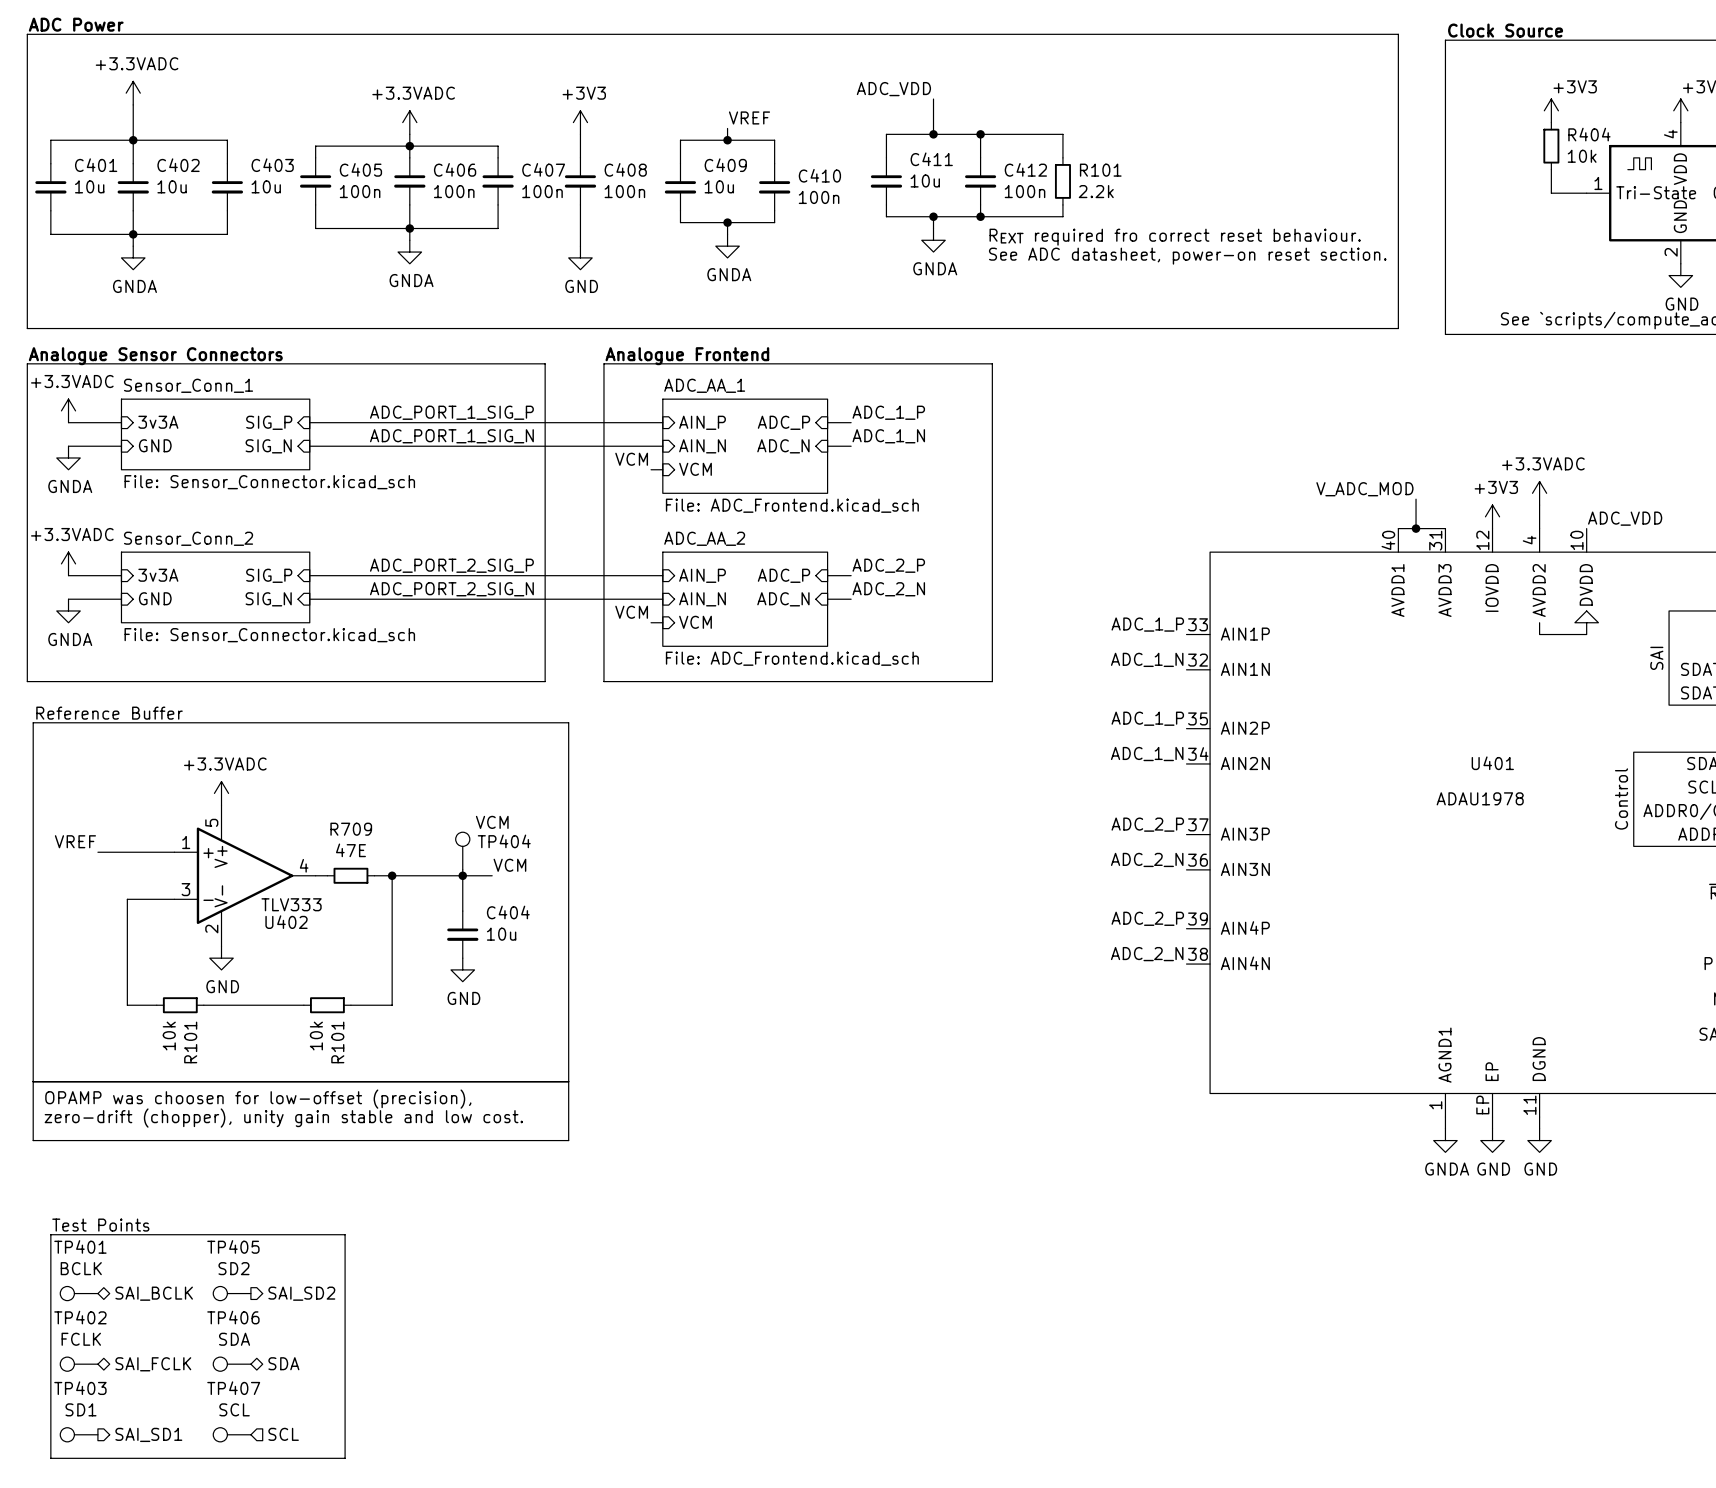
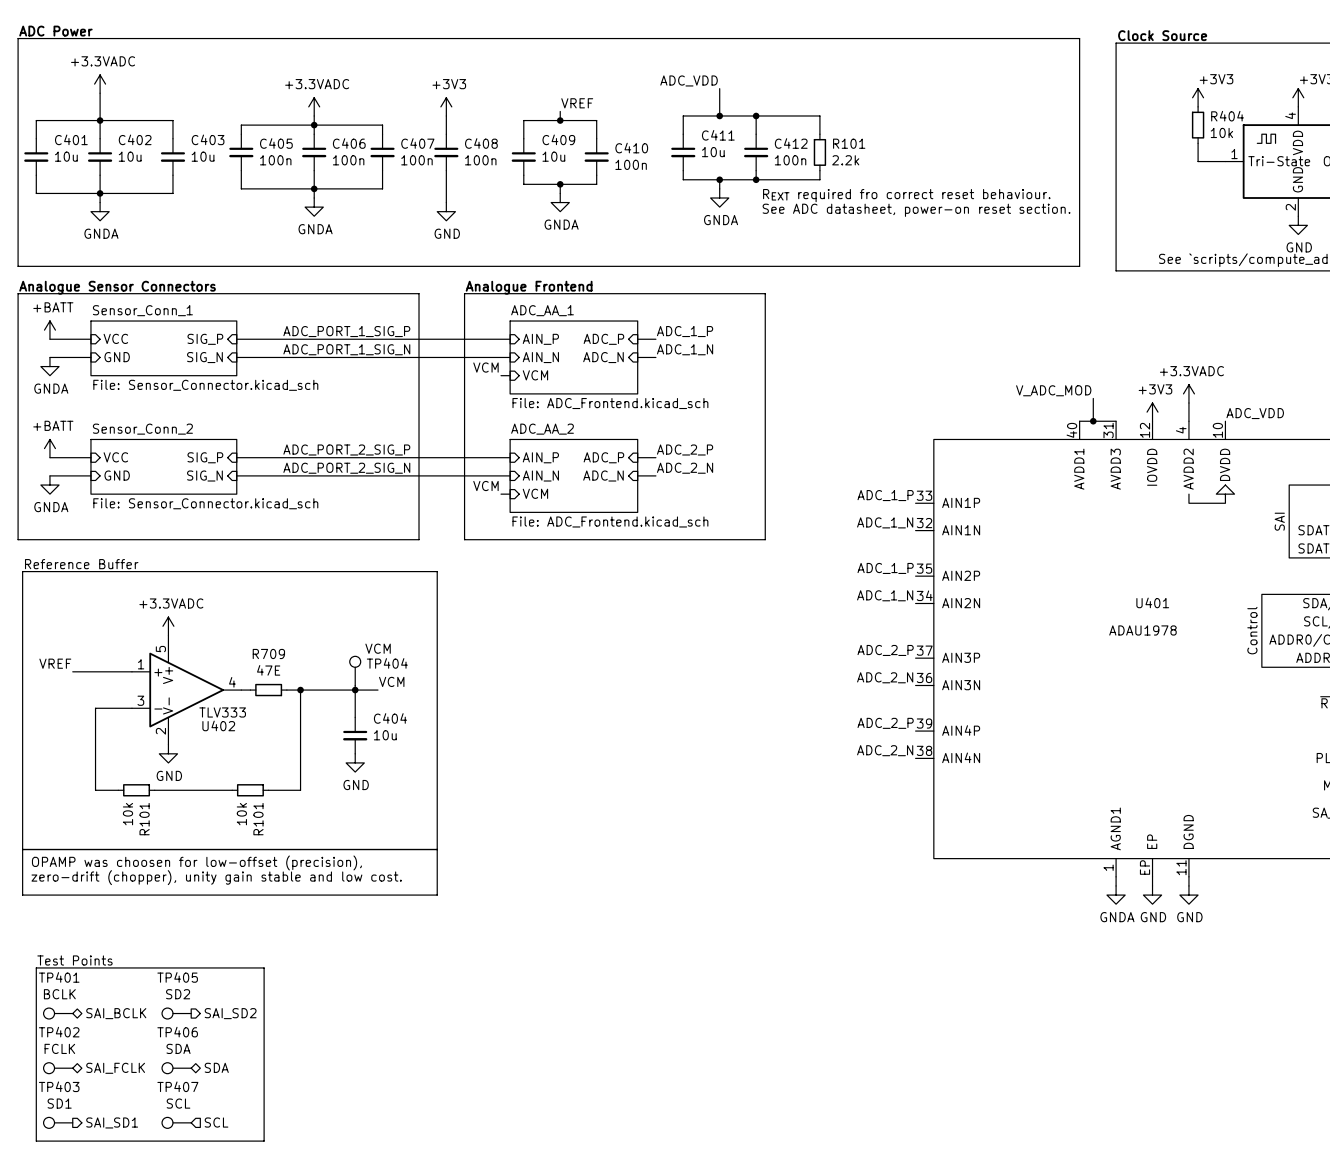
power symbol: +3.3VADC (68, 410) -> +BATT (49, 330)
sheet pin: 3v3A (158, 422) -> VCC (115, 338)
power symbol: +3.3VADC (68, 563) -> +BATT (49, 448)
sheet pin: 3v3A (158, 575) -> VCC (115, 457)

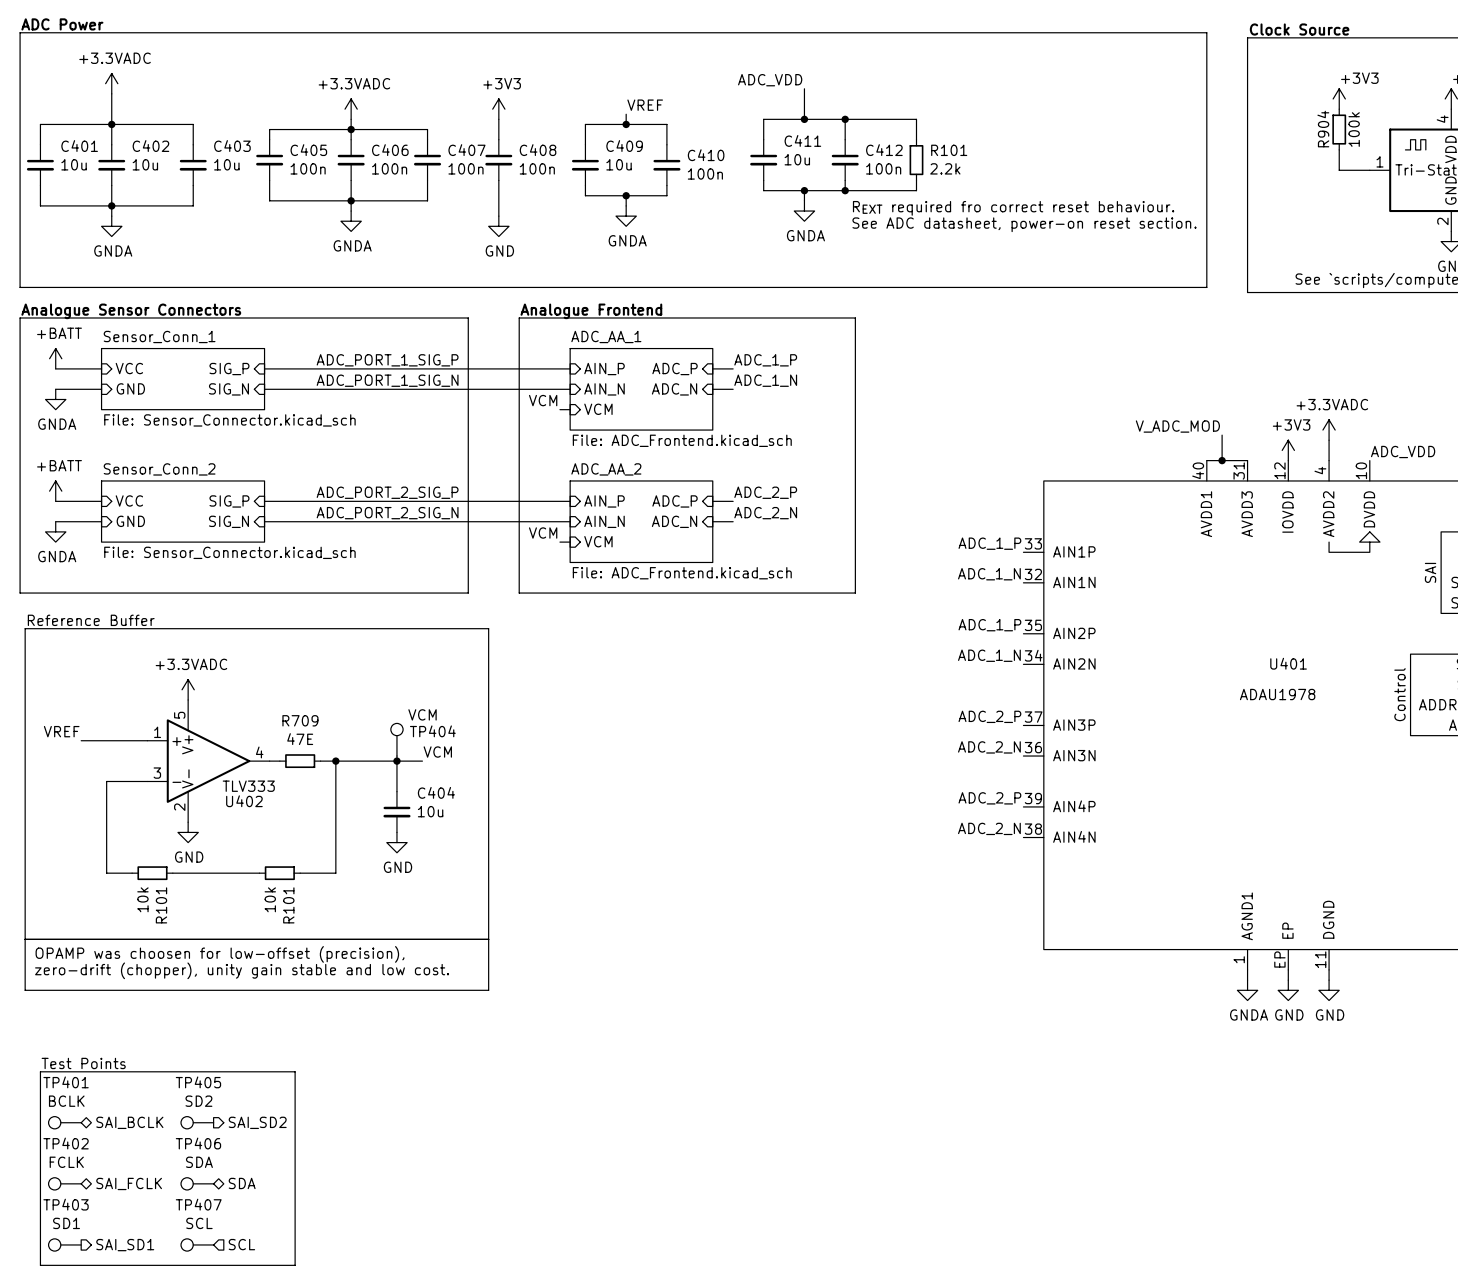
R404 name: R404 (1227, 116) -> R904 (1323, 129)
R404 value: 10k (1221, 132) -> 100k (1354, 129)

